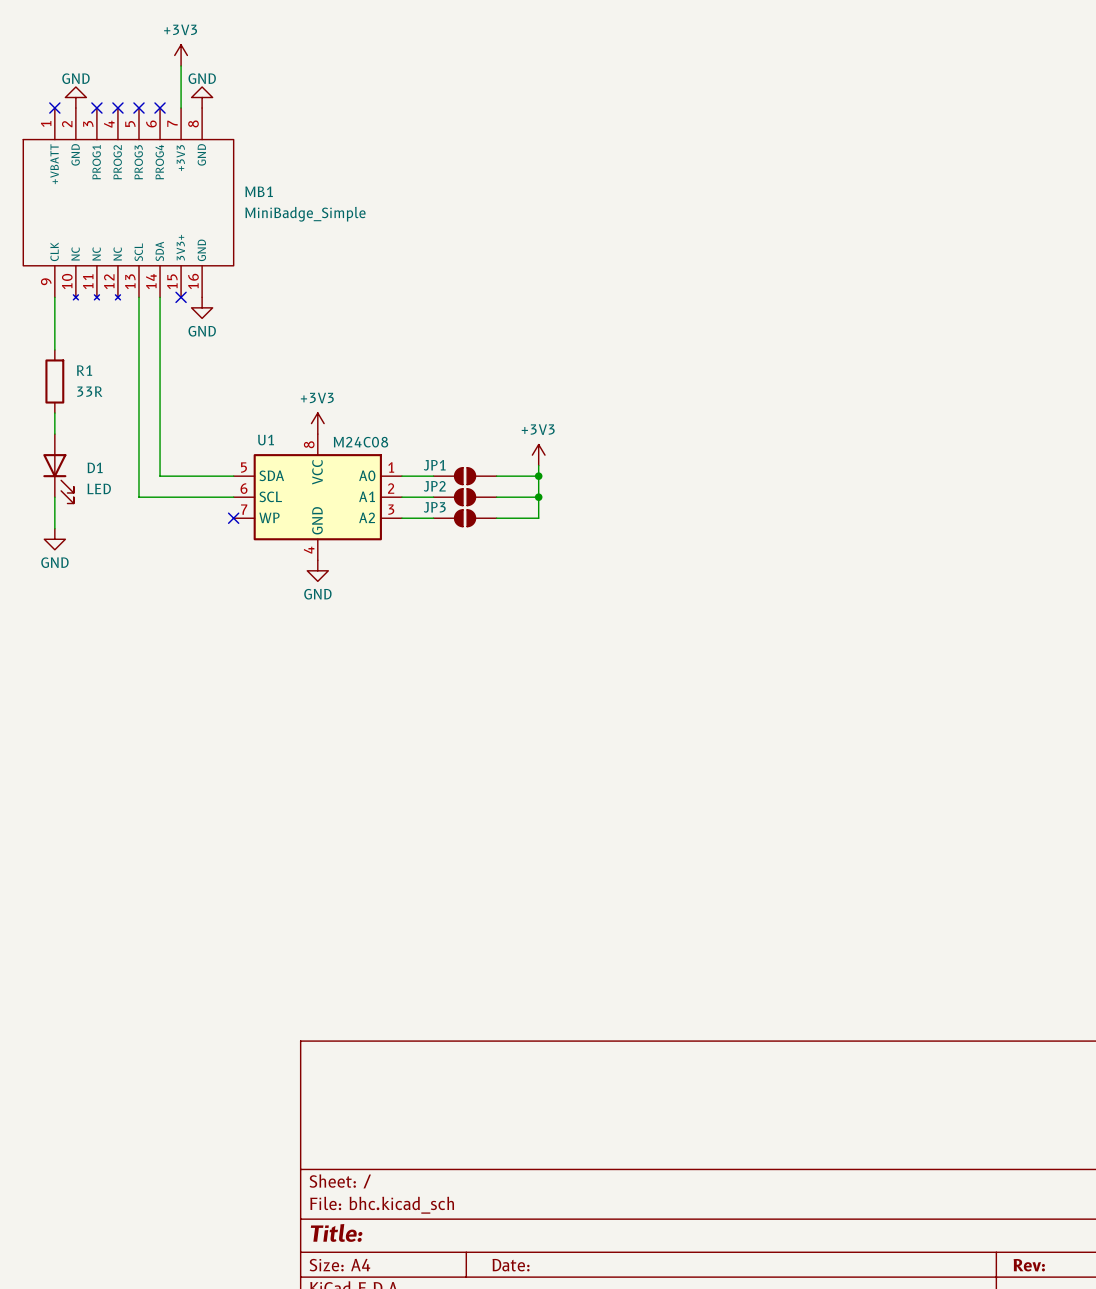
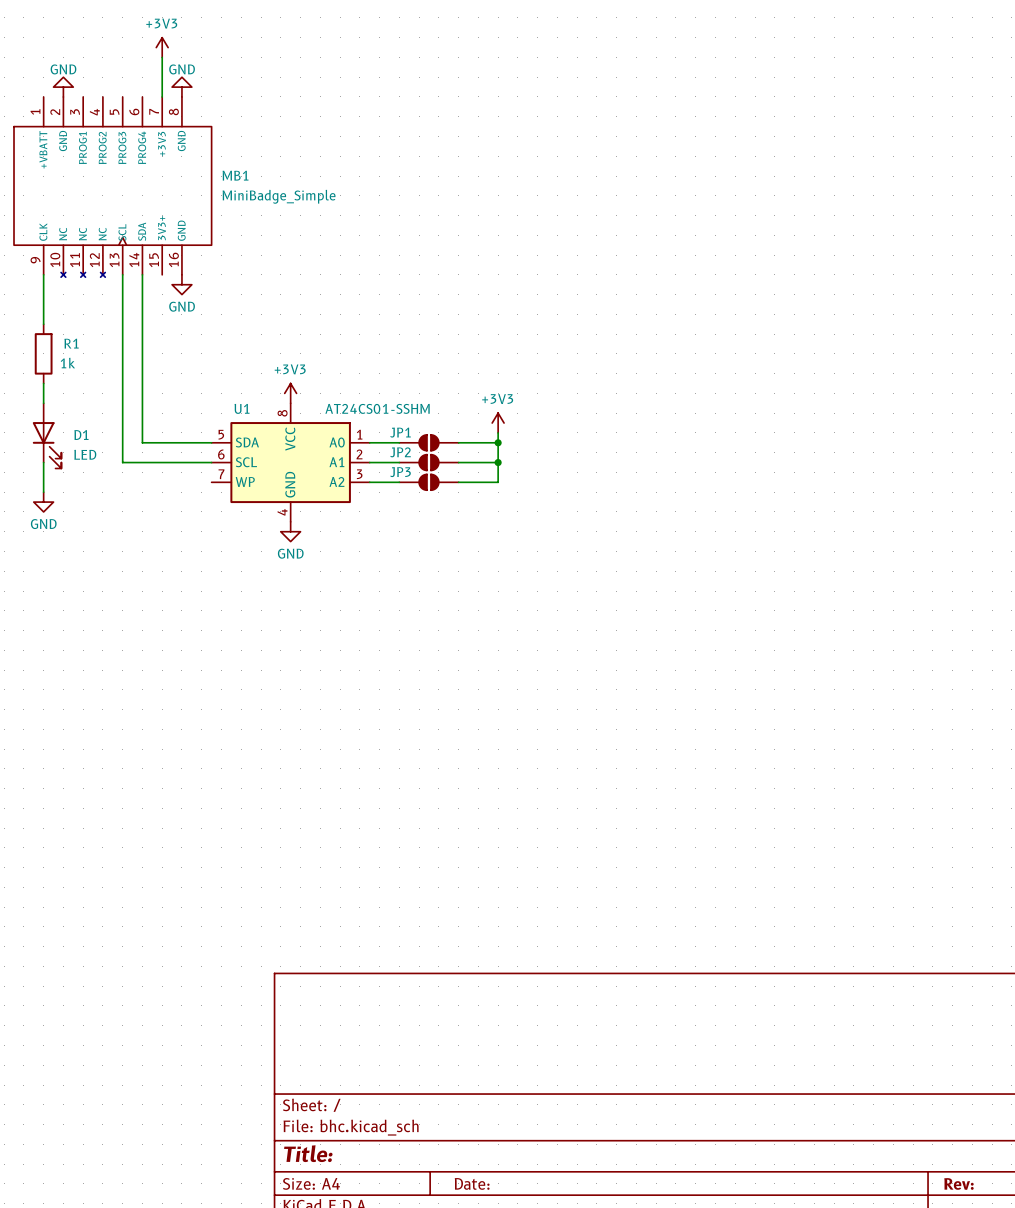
MB1 symbol: [23, 108, 234, 300] -> [14, 96, 212, 278]
no-connect mark: (54, 108) -> none
no-connect mark: (96, 108) -> none
no-connect mark: (117, 108) -> none
no-connect mark: (138, 108) -> none
no-connect mark: (160, 108) -> none
no-connect mark: (181, 297) -> none
R1 value: 33R (89, 391) -> 1k (67, 363)
U1 value: M24C08 (360, 442) -> AT24CS01-SSHM (377, 408)
no-connect mark: (233, 518) -> none

